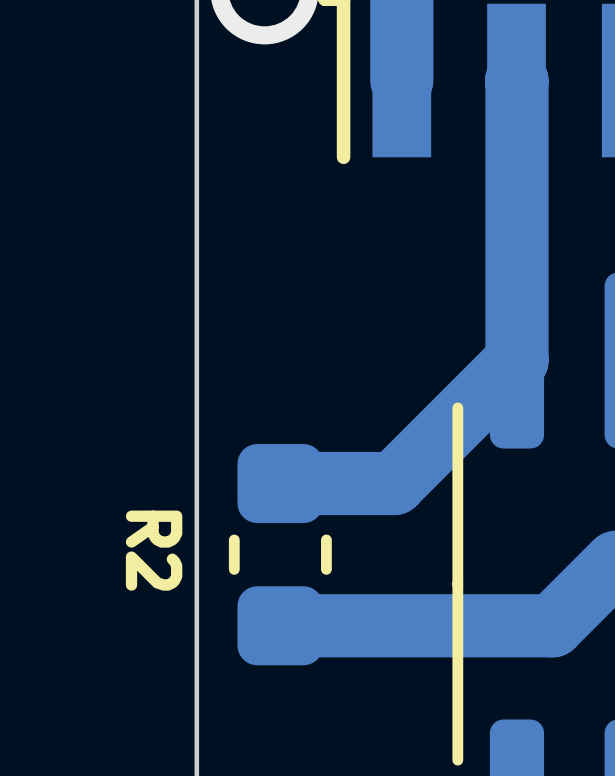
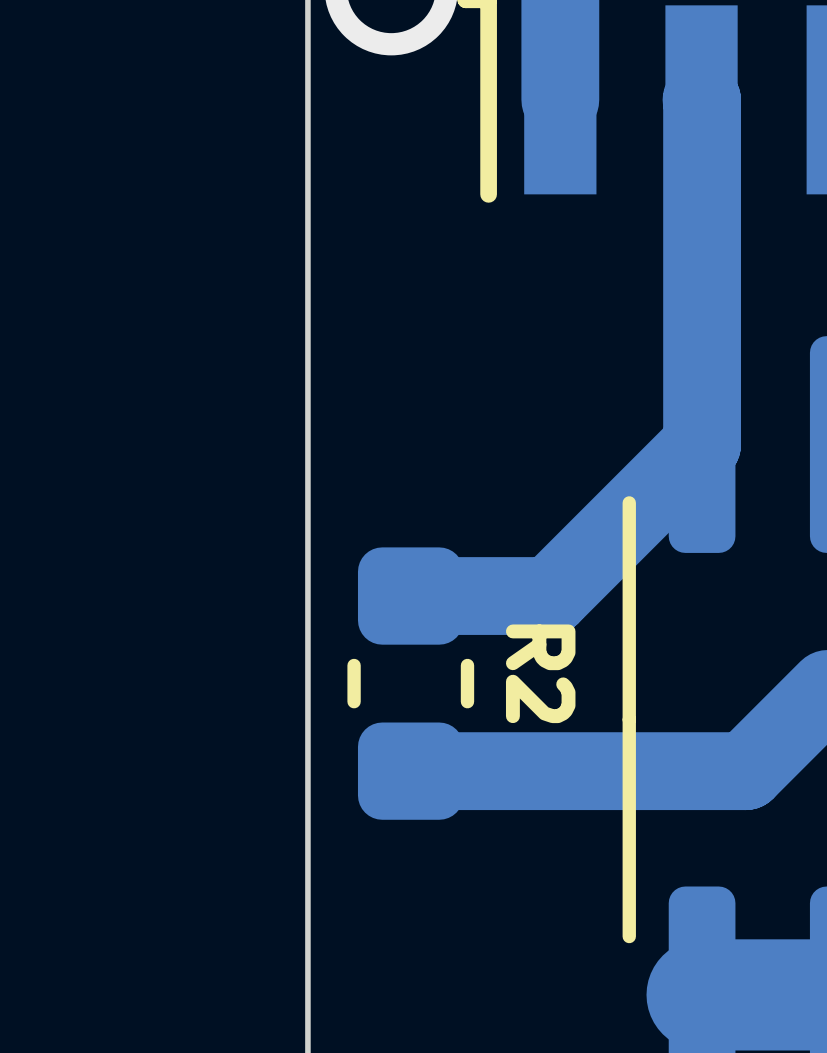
R2 name position: R2 (154, 550) -> R2 (540, 673)

